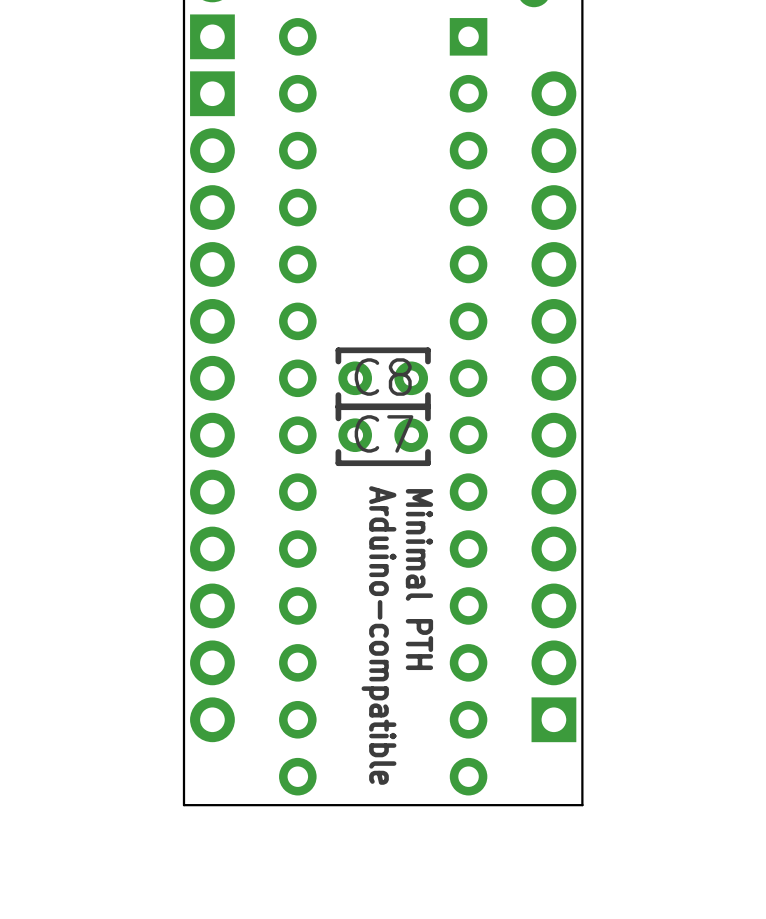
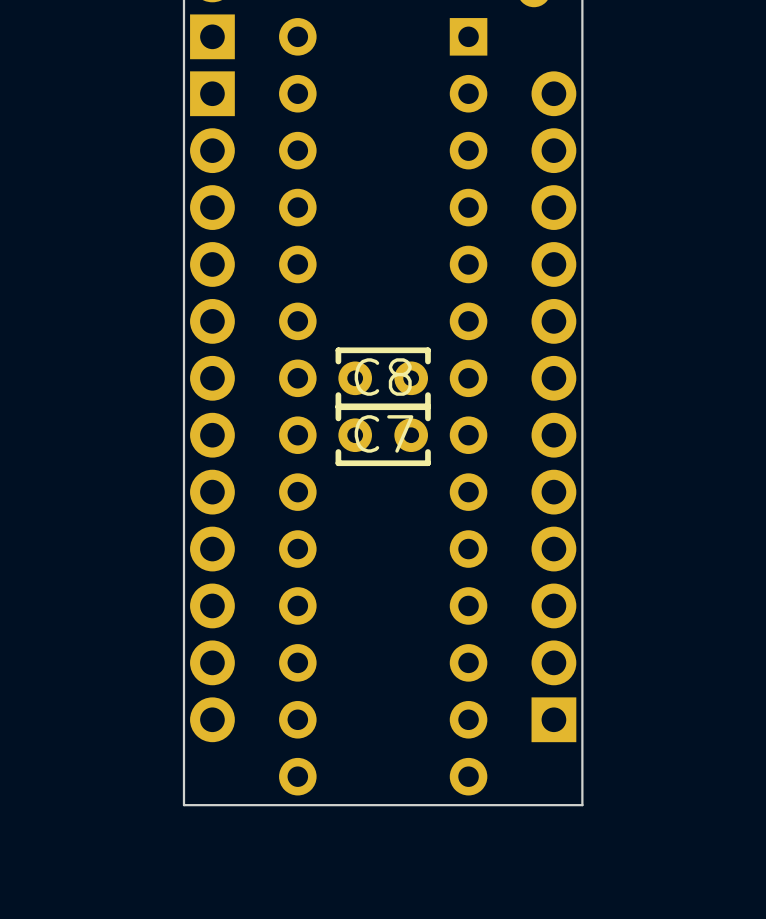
text: Minimal PTH (419, 579) -> none
text: Arduino-compatible (378, 635) -> none

